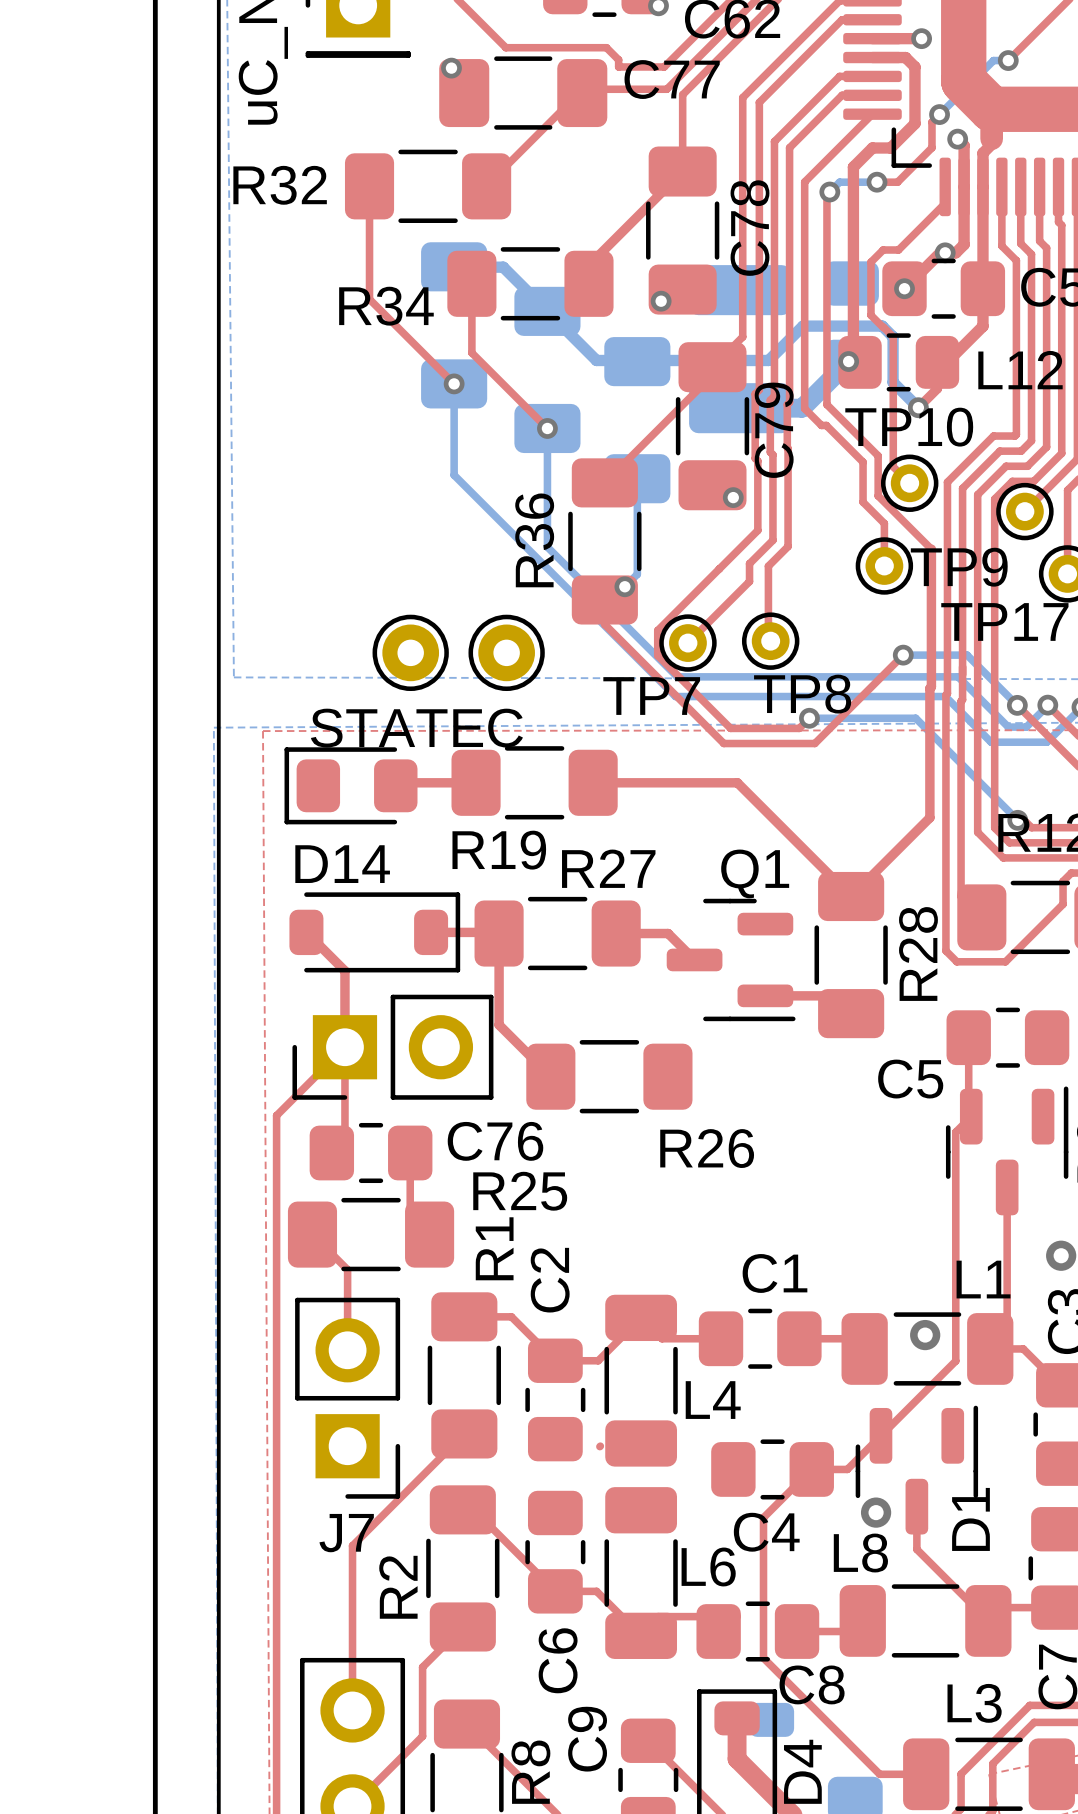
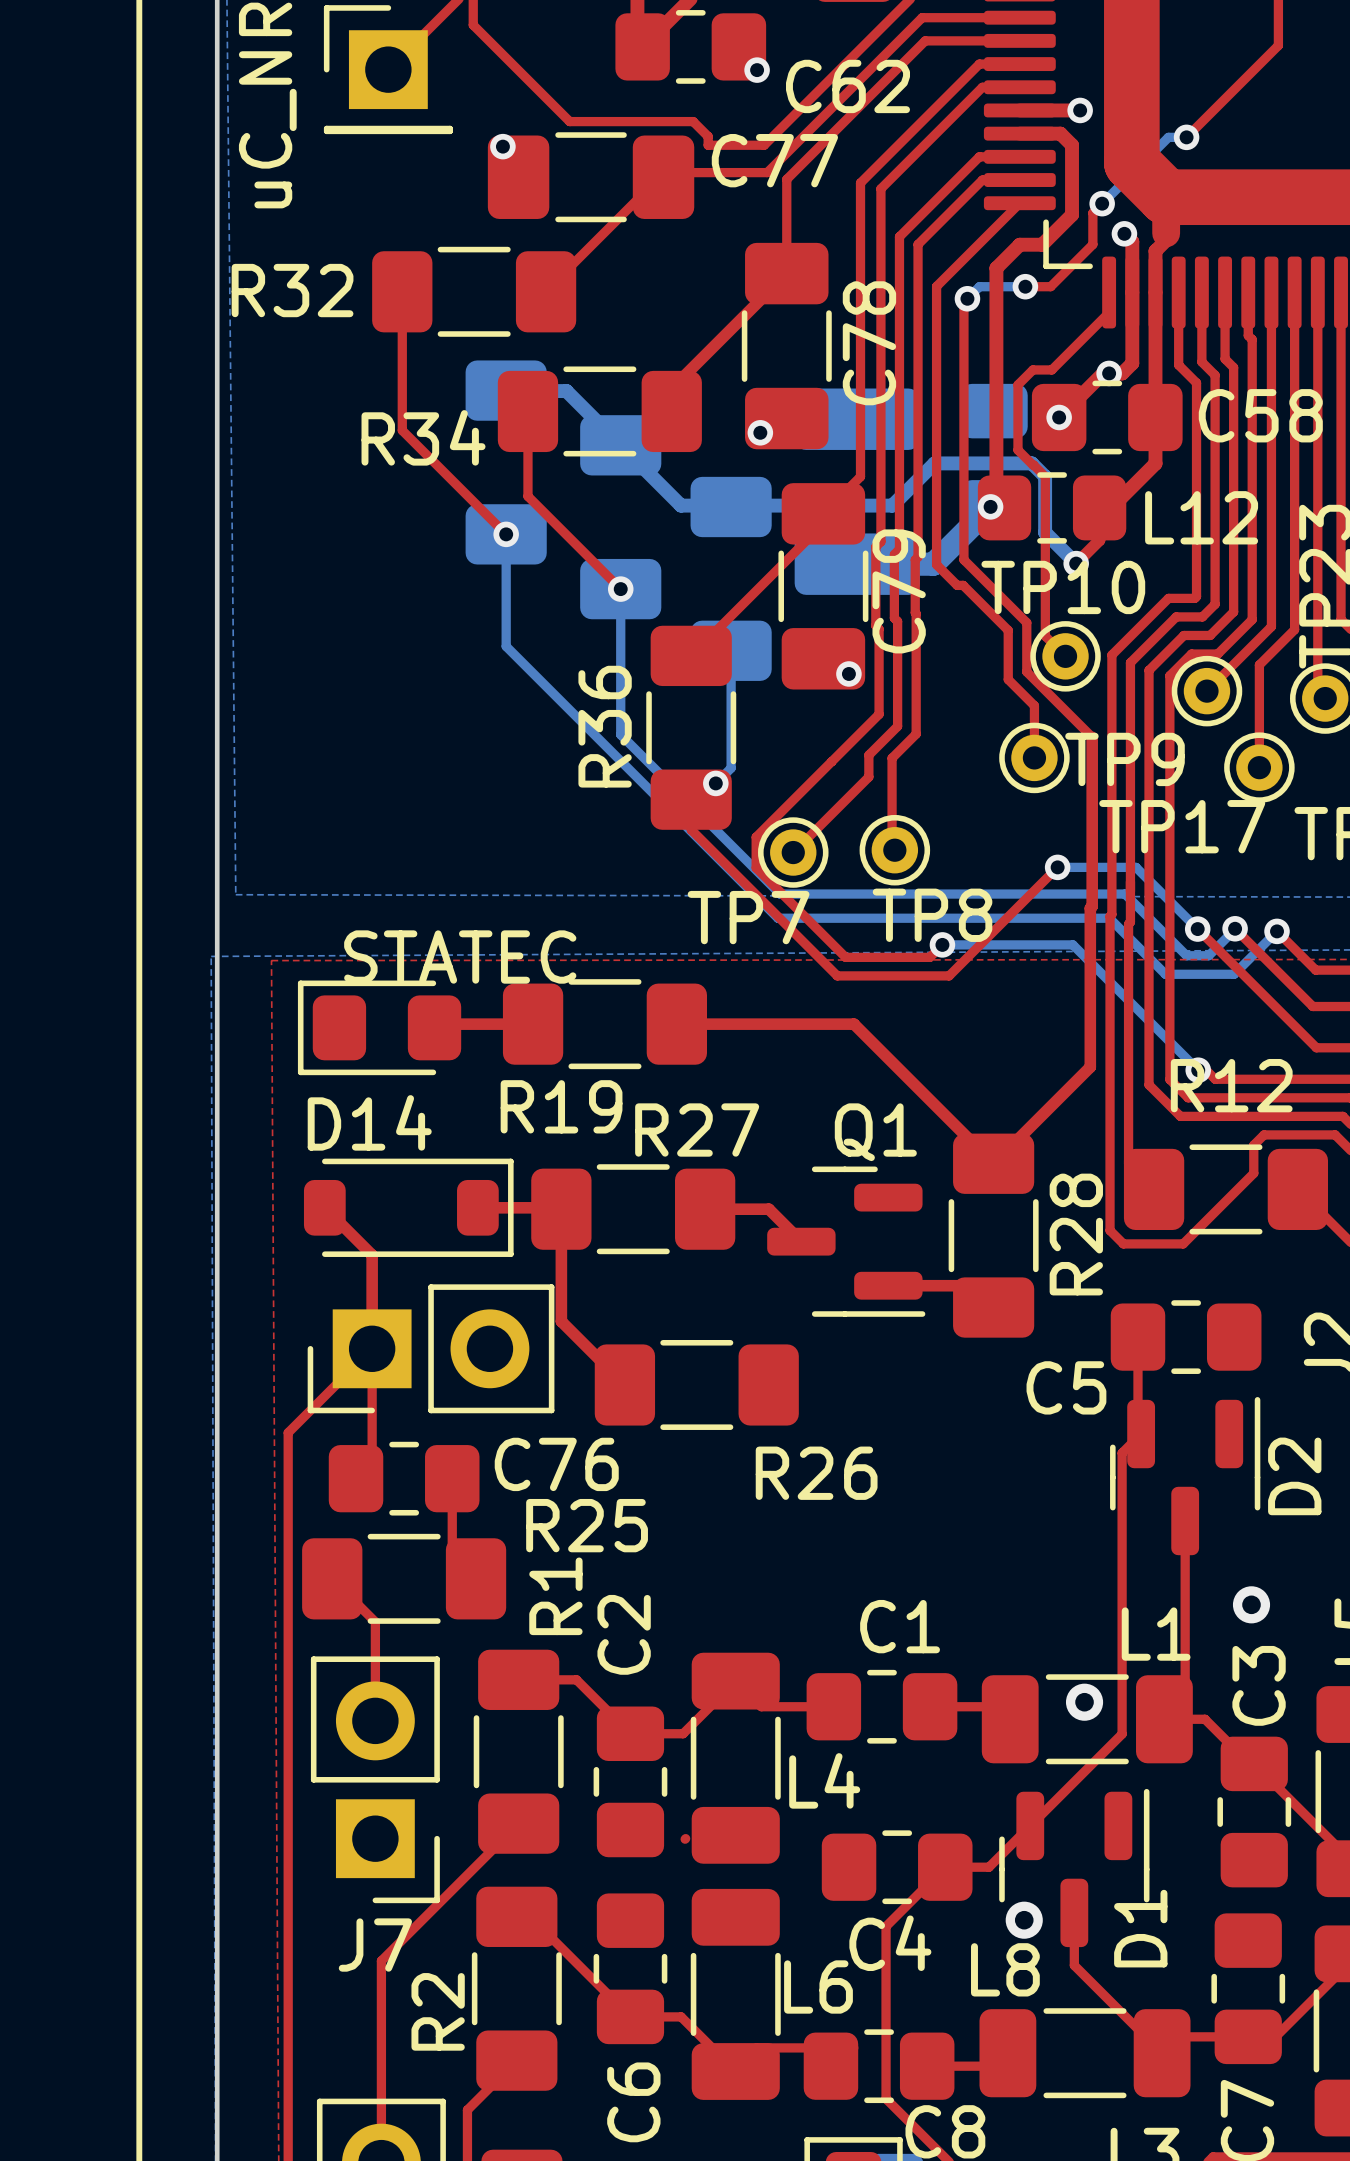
part: (410, 652) -> none
part: (506, 652) -> none

